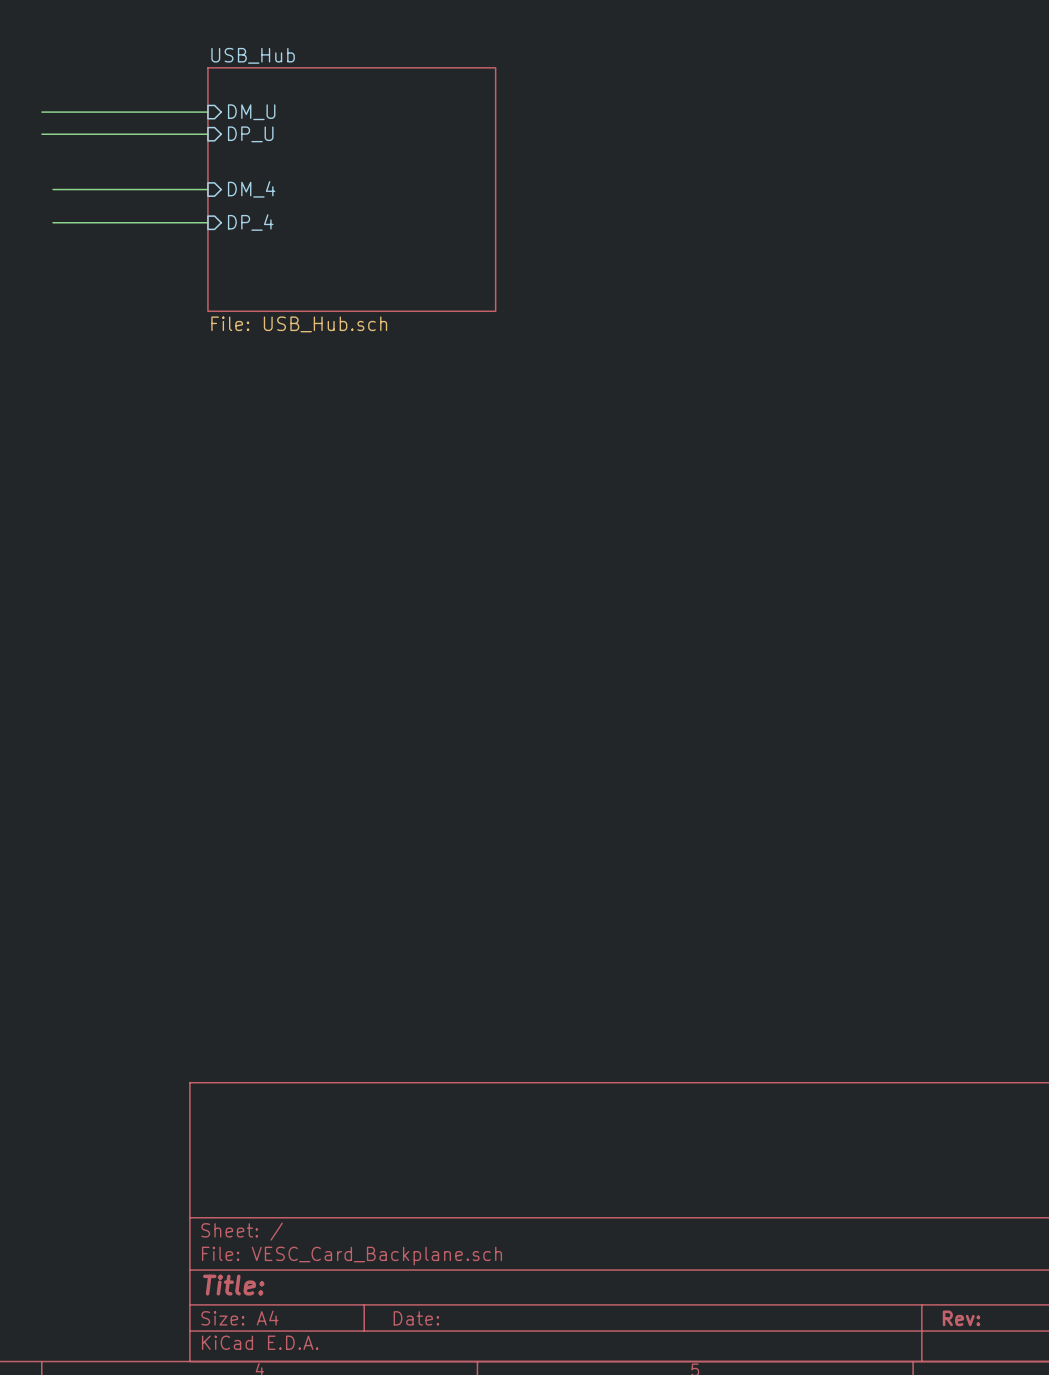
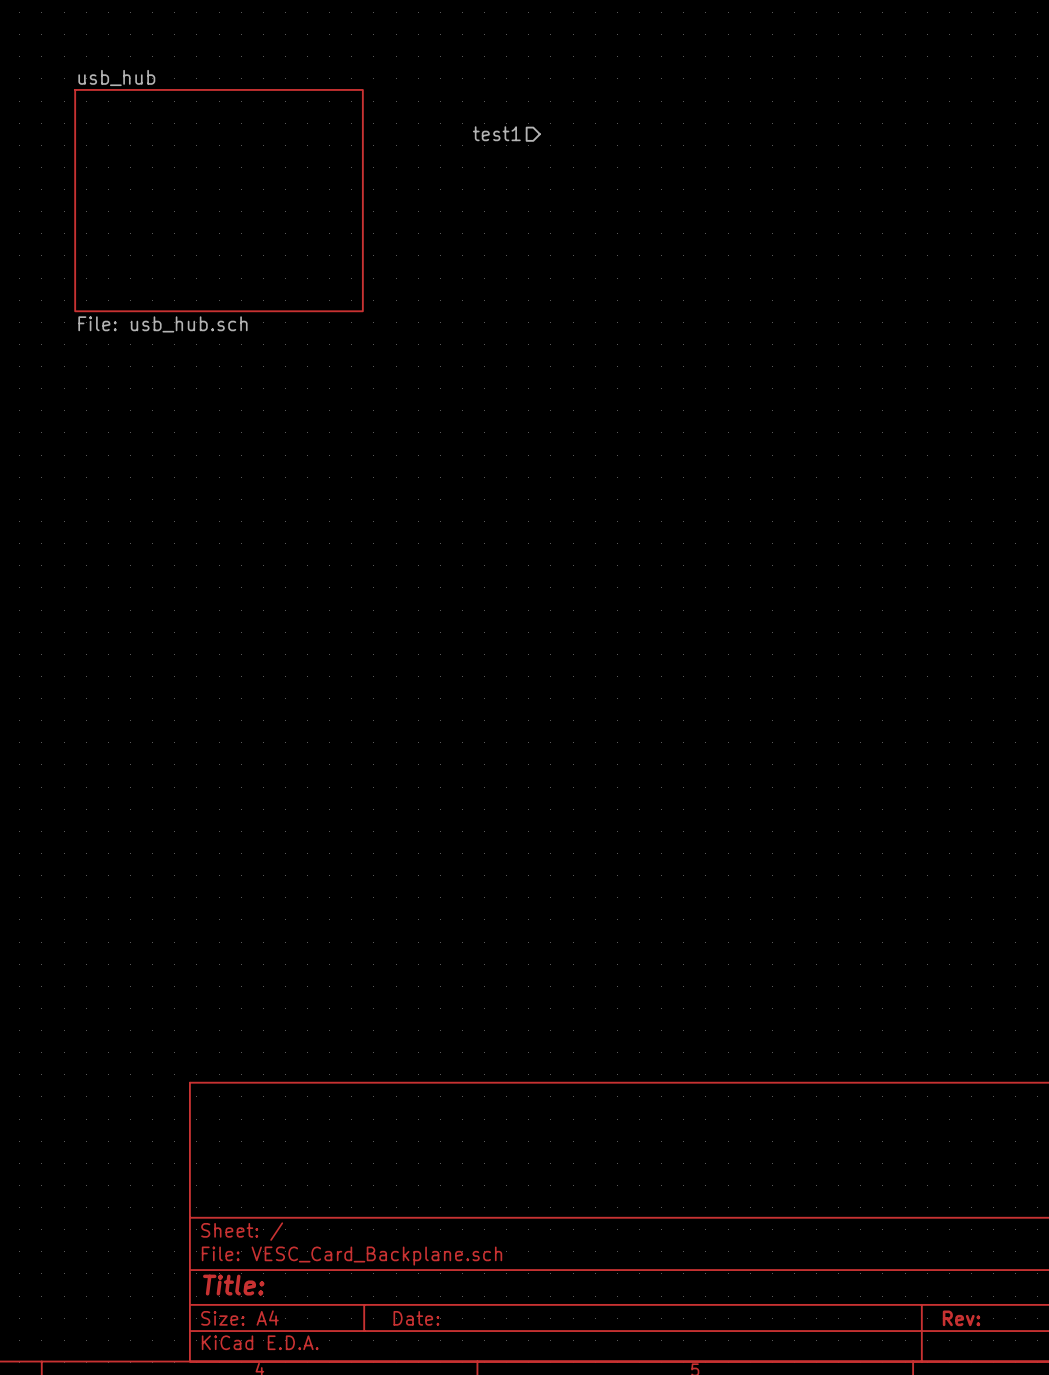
wire: (41, 112) (207, 112) -> none
sheet pin: DM_U (251, 112) -> none
hierarchical label: none -> test1 (496, 133)
wire: (41, 134) (207, 134) -> none
sheet pin: DP_U (250, 134) -> none
wire: (53, 189) (207, 189) -> none
sheet pin: DM_4 (251, 189) -> none
sheet USB_Hub: File: USB_Hub.sch (351, 189) -> none
sheet usb_hub: none -> File: usb_hub.sch (219, 200)
wire: (53, 222) (207, 222) -> none
sheet pin: DP_4 (250, 222) -> none

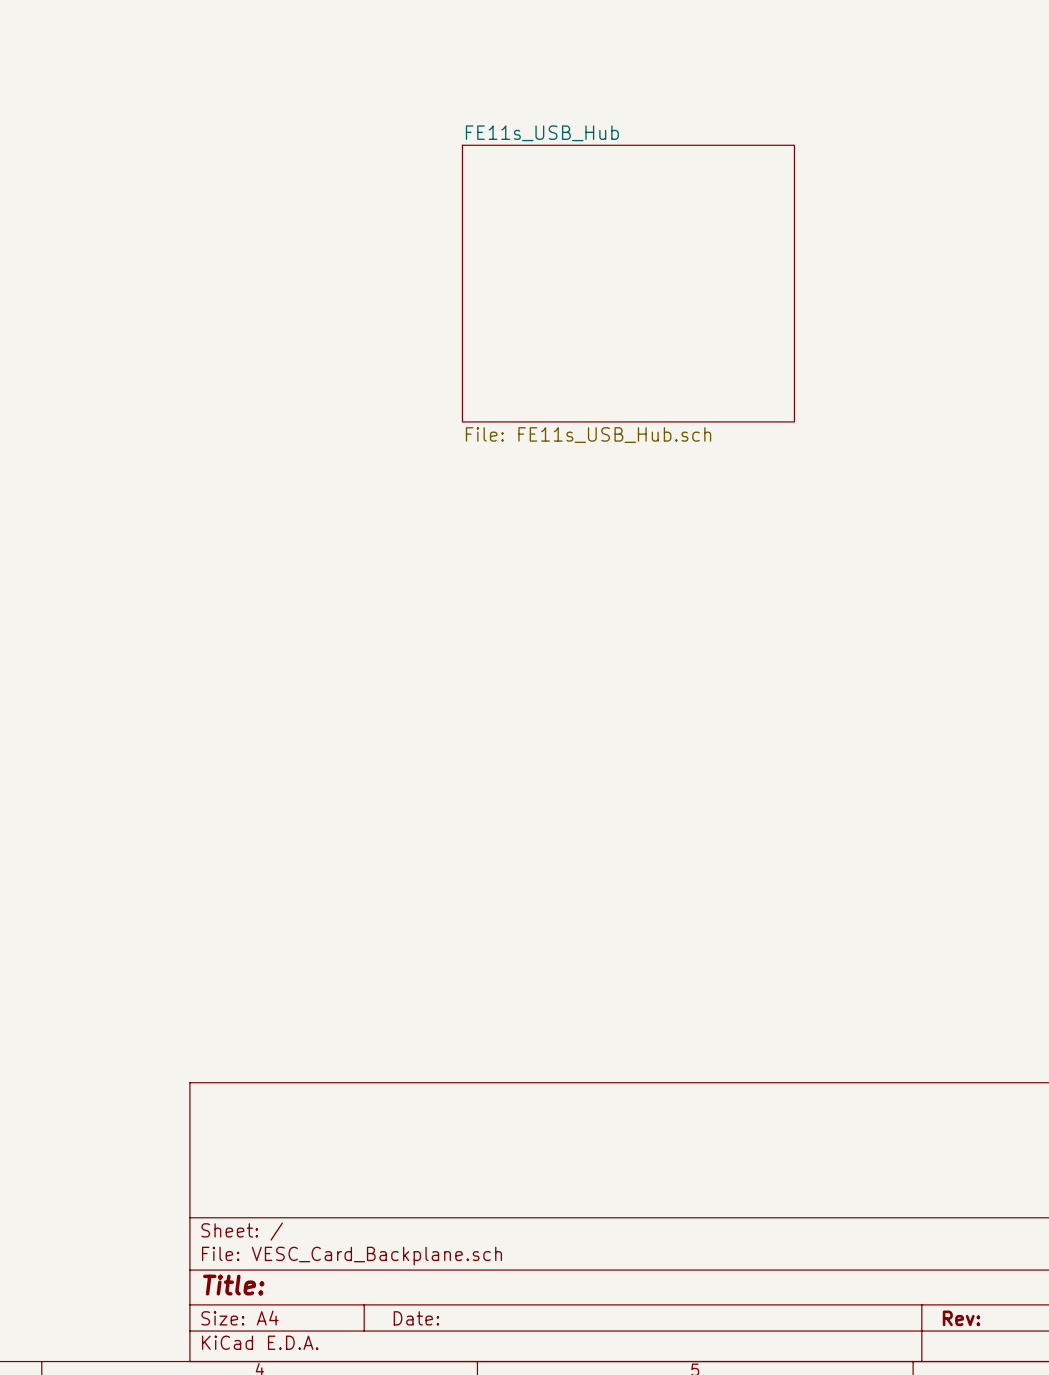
hierarchical label: test1 (496, 133) -> none
sheet usb_hub: File: usb_hub.sch (219, 200) -> none
sheet FE11s_USB_Hub: none -> File: FE11s_USB_Hub.sch (628, 283)

